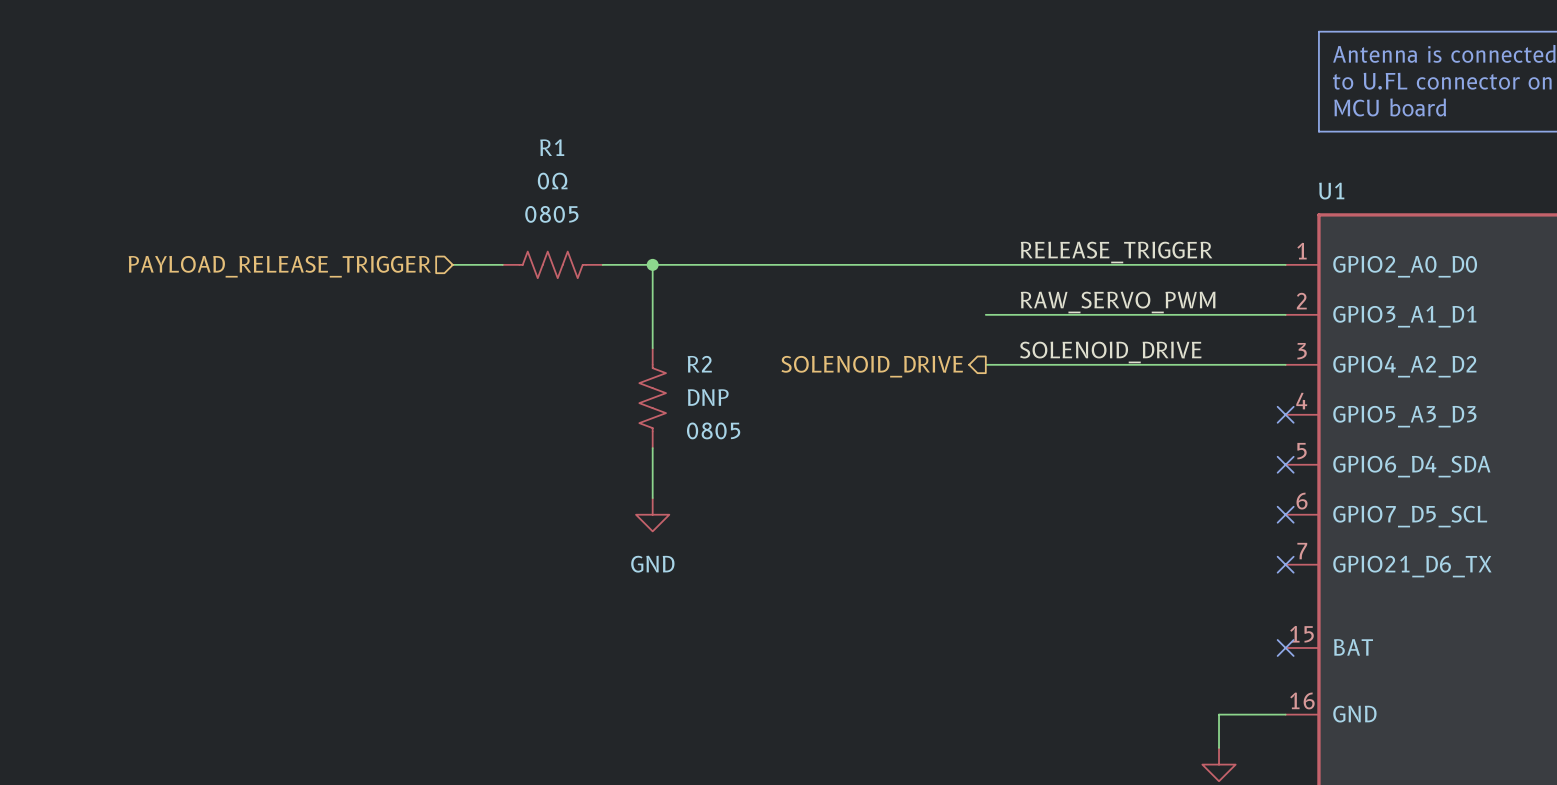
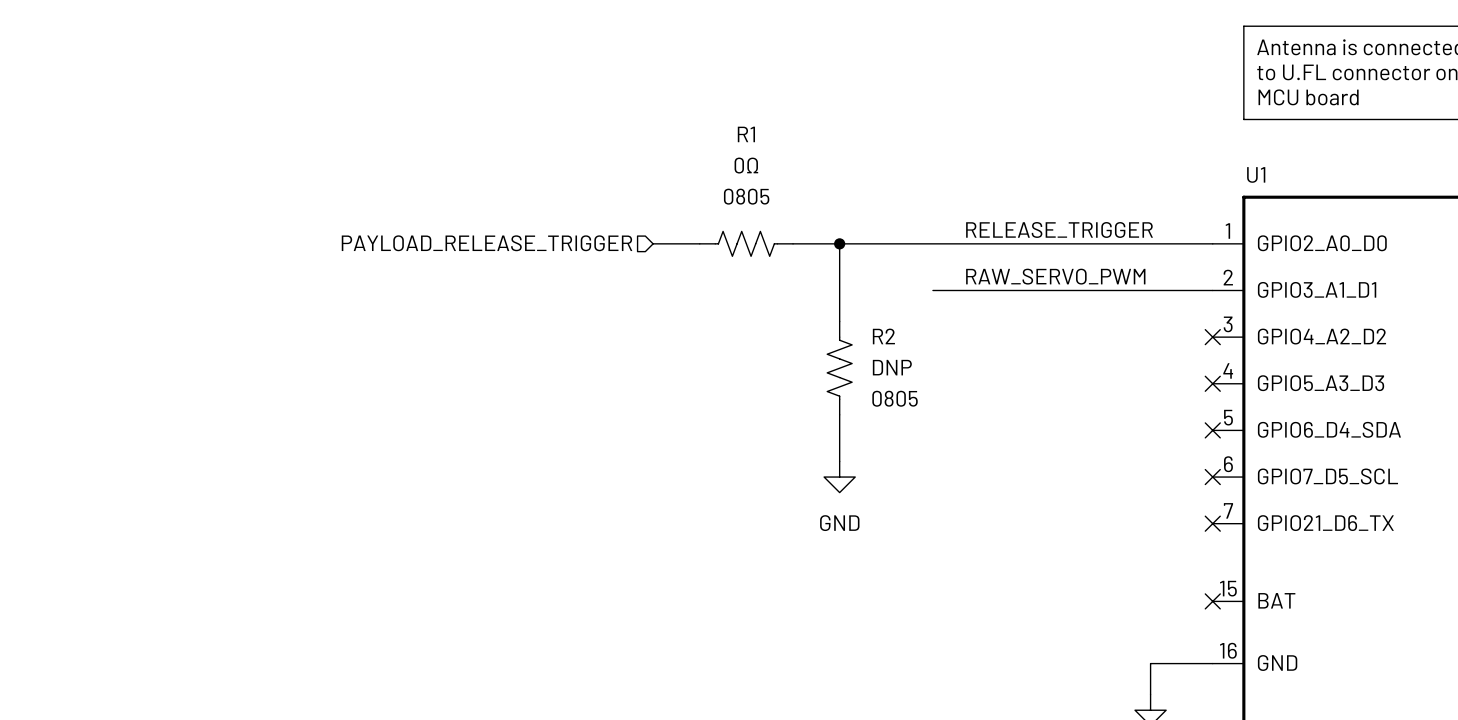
wire: (452, 264) (502, 264) -> none
R1 position: (552, 264) -> (746, 243)
wire: (602, 264) (685, 264) -> none
wire: (652, 264) (652, 348) -> (839, 243) (839, 321)
junction: (652, 264) -> none
junction: none -> (839, 243)
hierarchical label position: PAYLOAD_RELEASE_TRIGGER (279, 266) -> PAYLOAD_RELEASE_TRIGGER (487, 243)
label: SOLENOID_DRIVE (1110, 352) -> none
wire: (985, 364) (1285, 364) -> none
no-connect mark: none -> (1212, 337)
hierarchical label: SOLENOID_DRIVE (872, 366) -> none
R2 position: (652, 398) -> (839, 368)
wire: (652, 448) (652, 498) -> (839, 414) (839, 461)
power symbol position: GND (652, 514) -> GND (839, 477)

